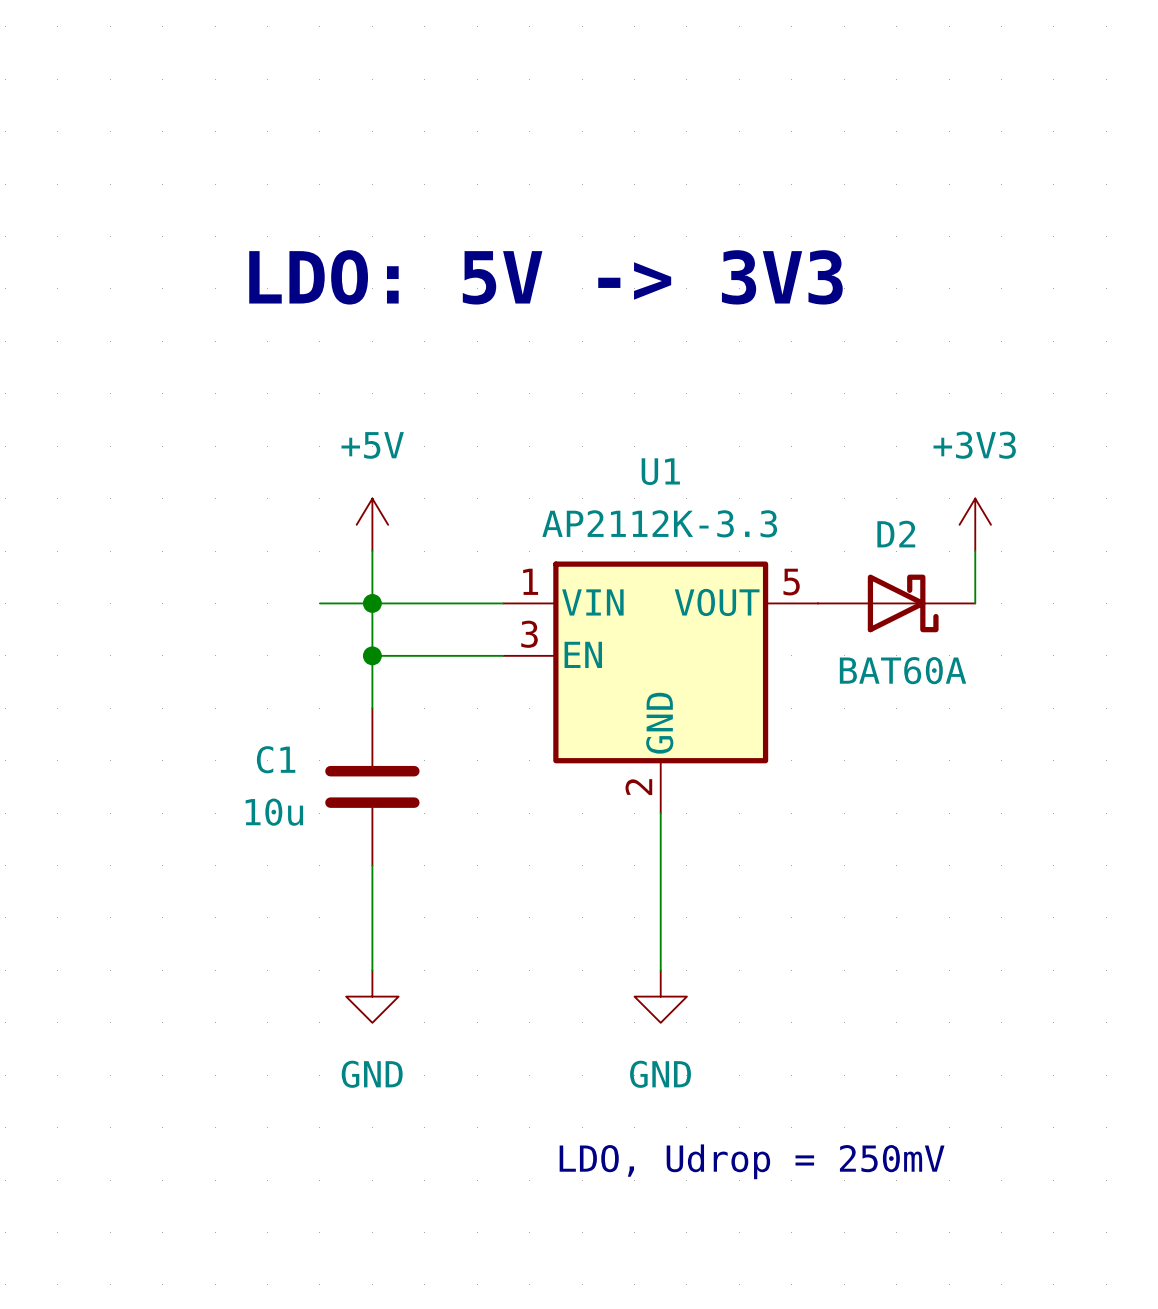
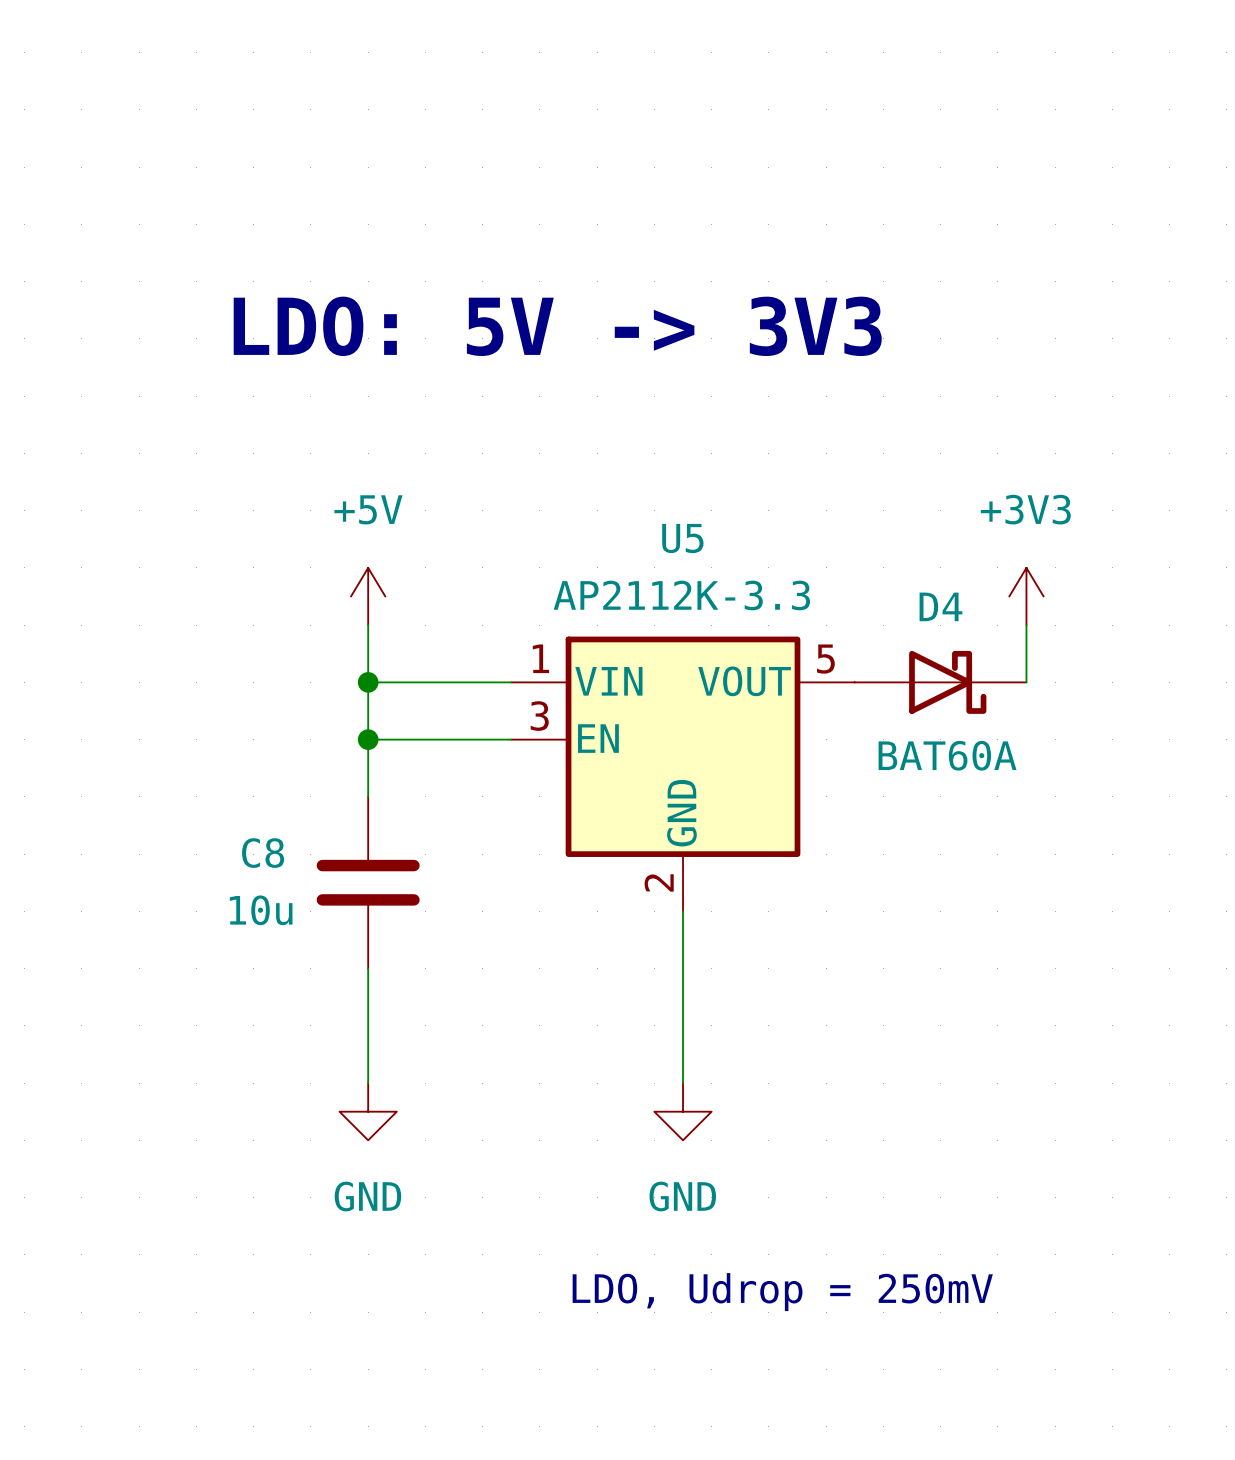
U1 name: U1 (660, 471) -> U5 (682, 538)
D2 name: D2 (896, 534) -> D4 (940, 606)
wire: (319, 603) (372, 603) -> none
C1 name: C1 (276, 759) -> C8 (263, 853)

